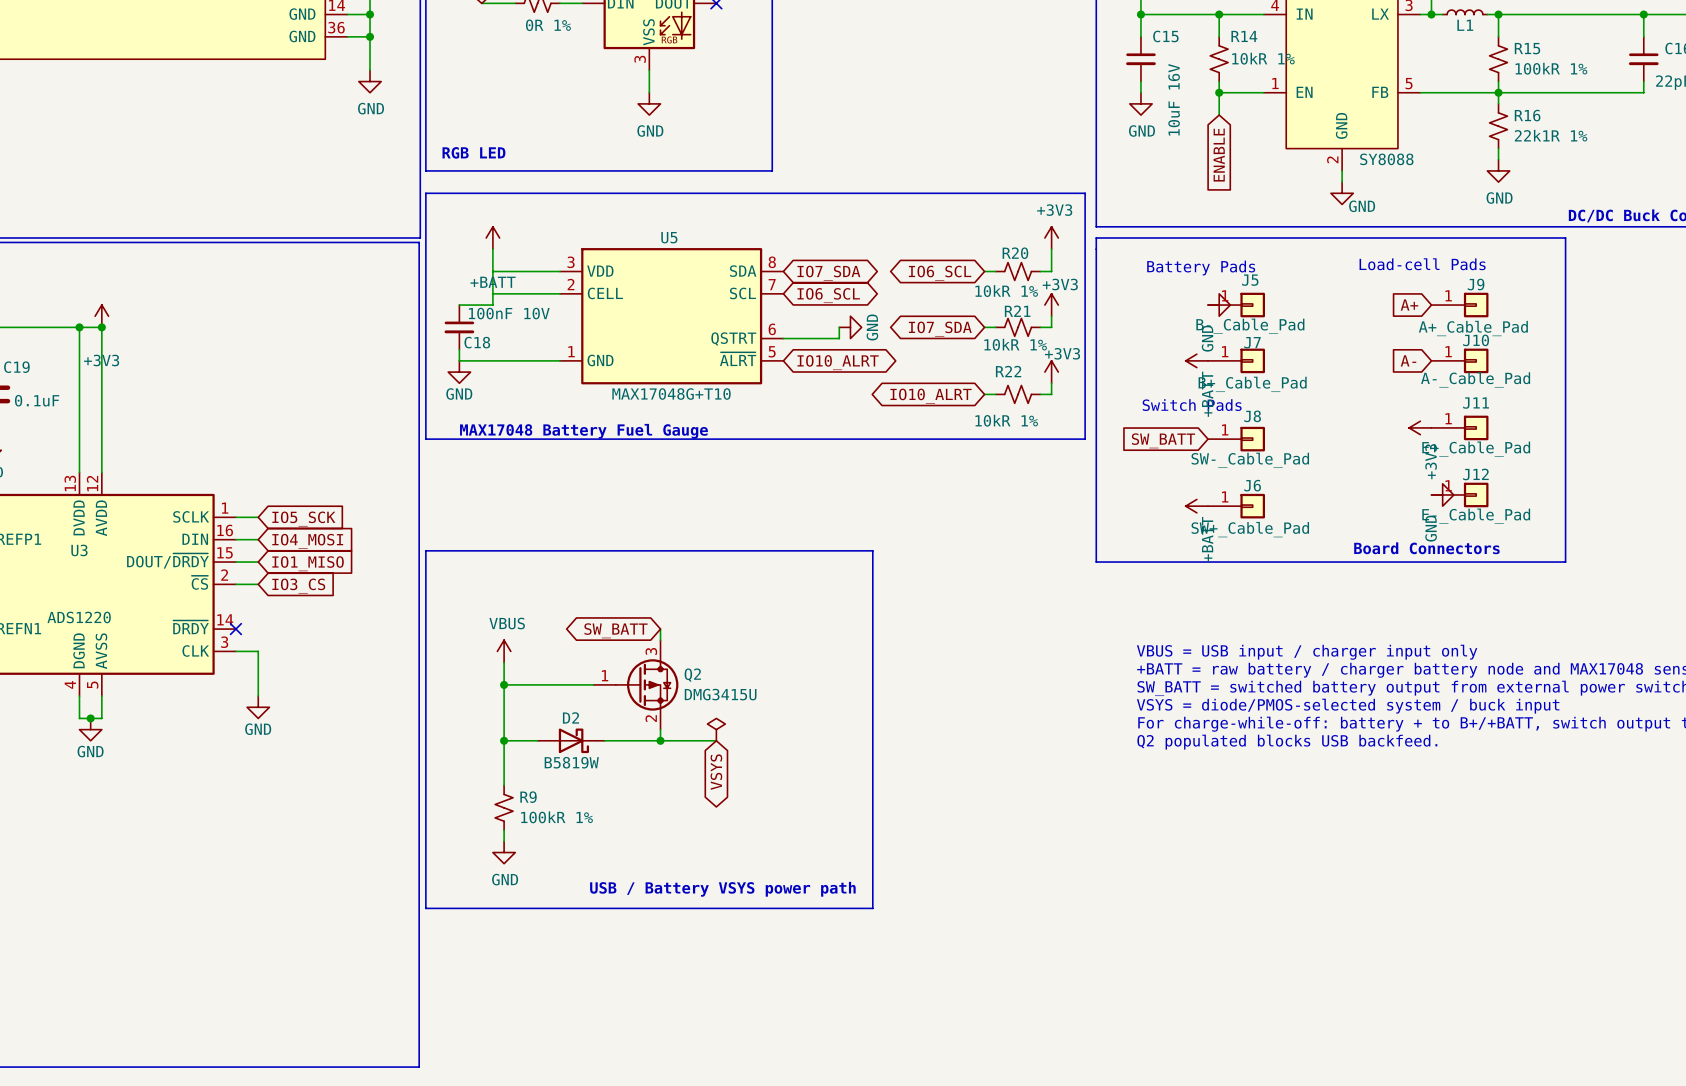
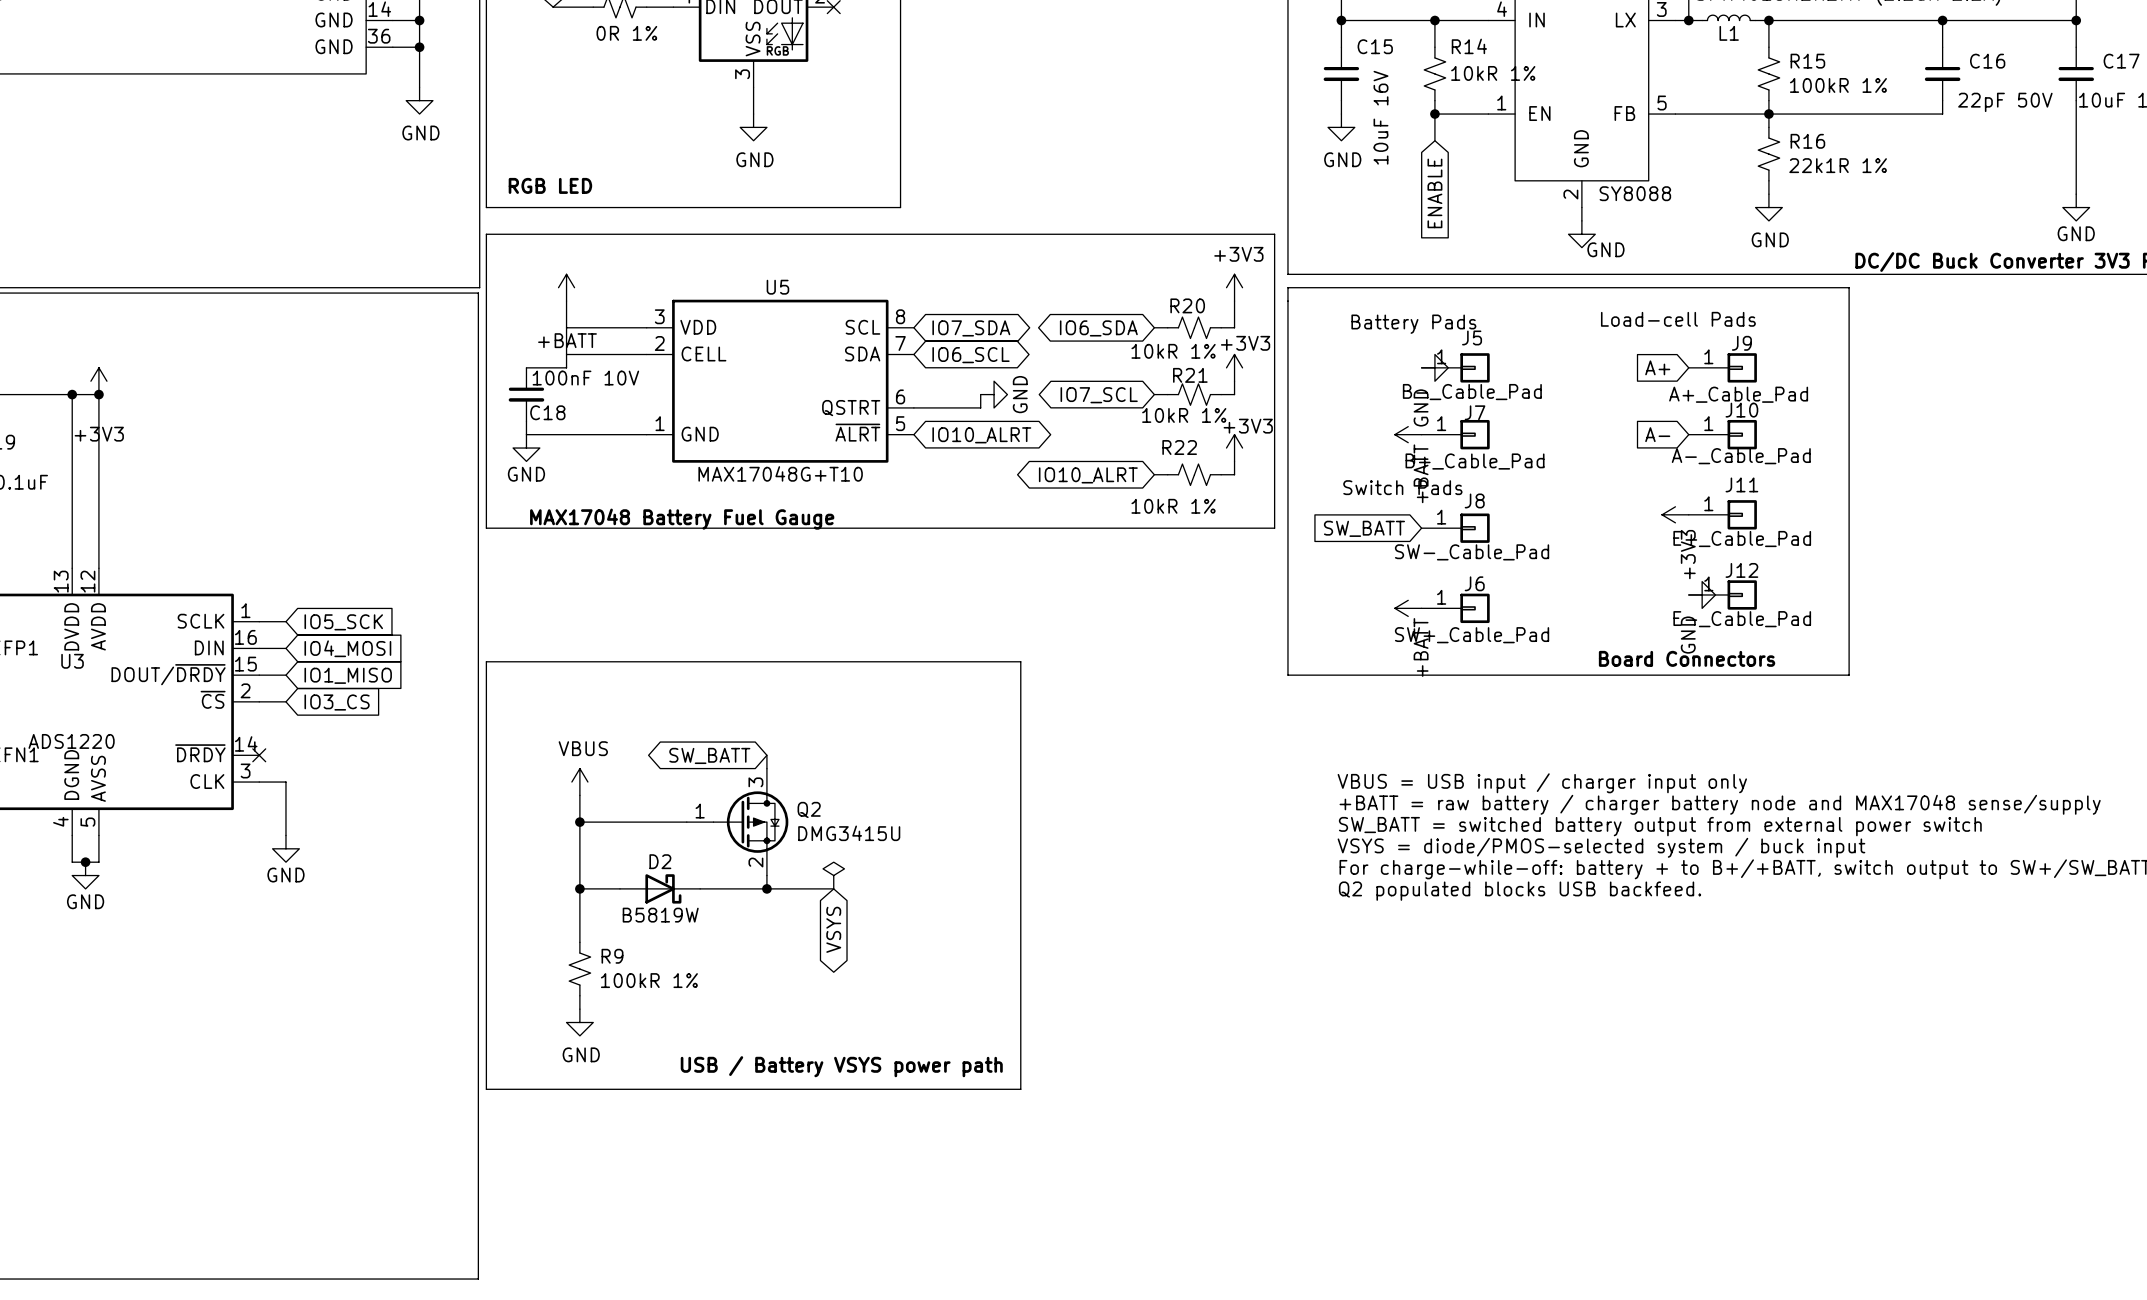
U5 pin name: SDA (743, 271) -> SCL (862, 327)
global label: IO6_SCL (940, 273) -> IO6_SDA (1098, 328)
U5 pin name: SCL (742, 293) -> SDA (862, 354)
global label: IO7_SDA (940, 329) -> IO7_SCL (1099, 395)

